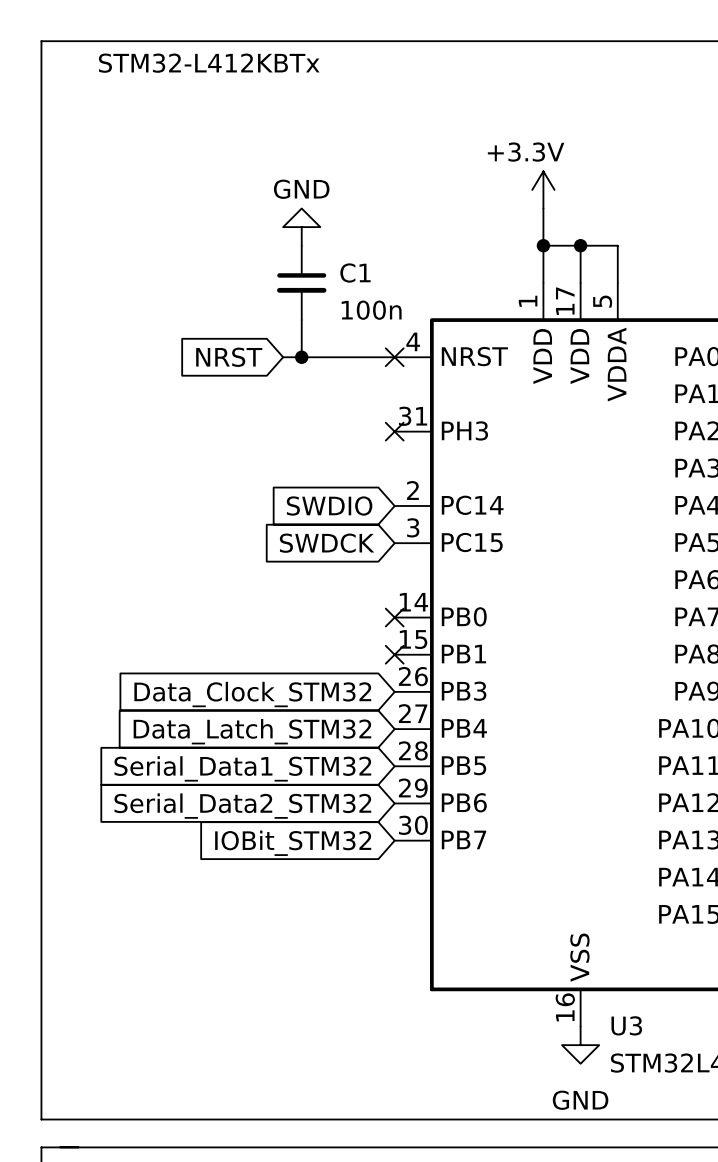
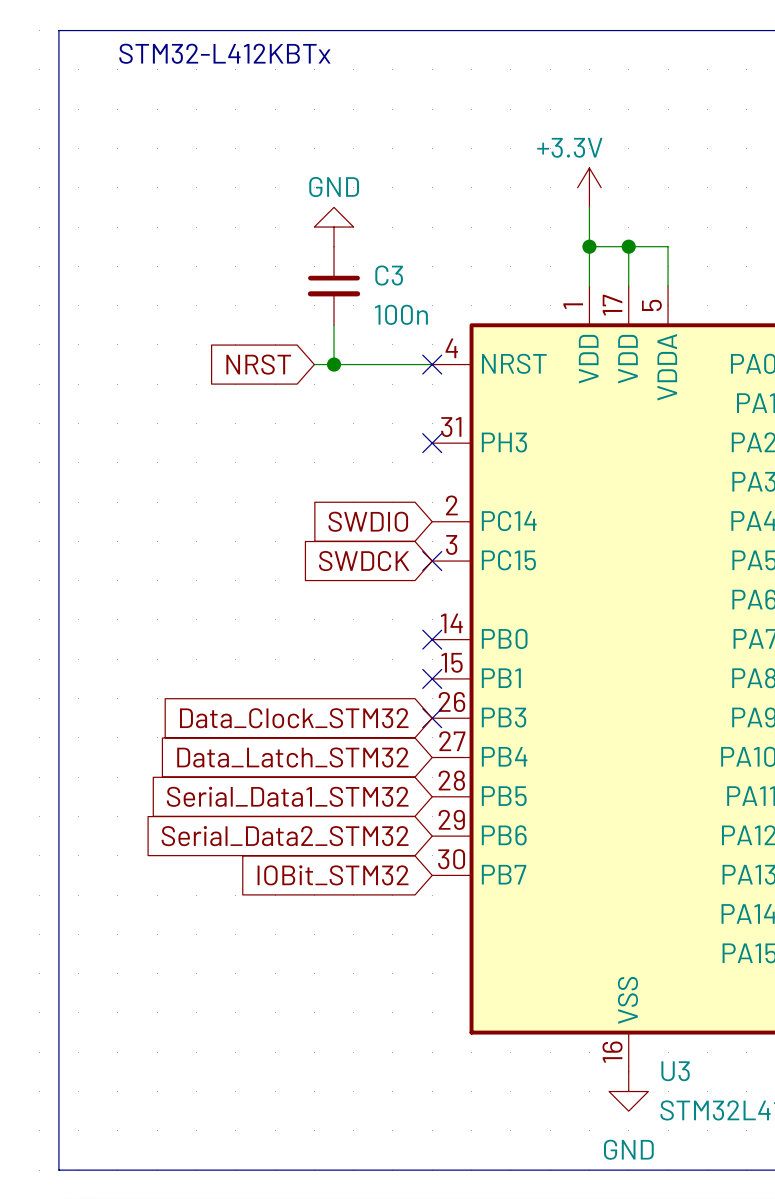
C1 name: C1 (355, 273) -> C3 (389, 275)
no-connect mark: none -> (432, 561)
no-connect mark: none -> (432, 718)

